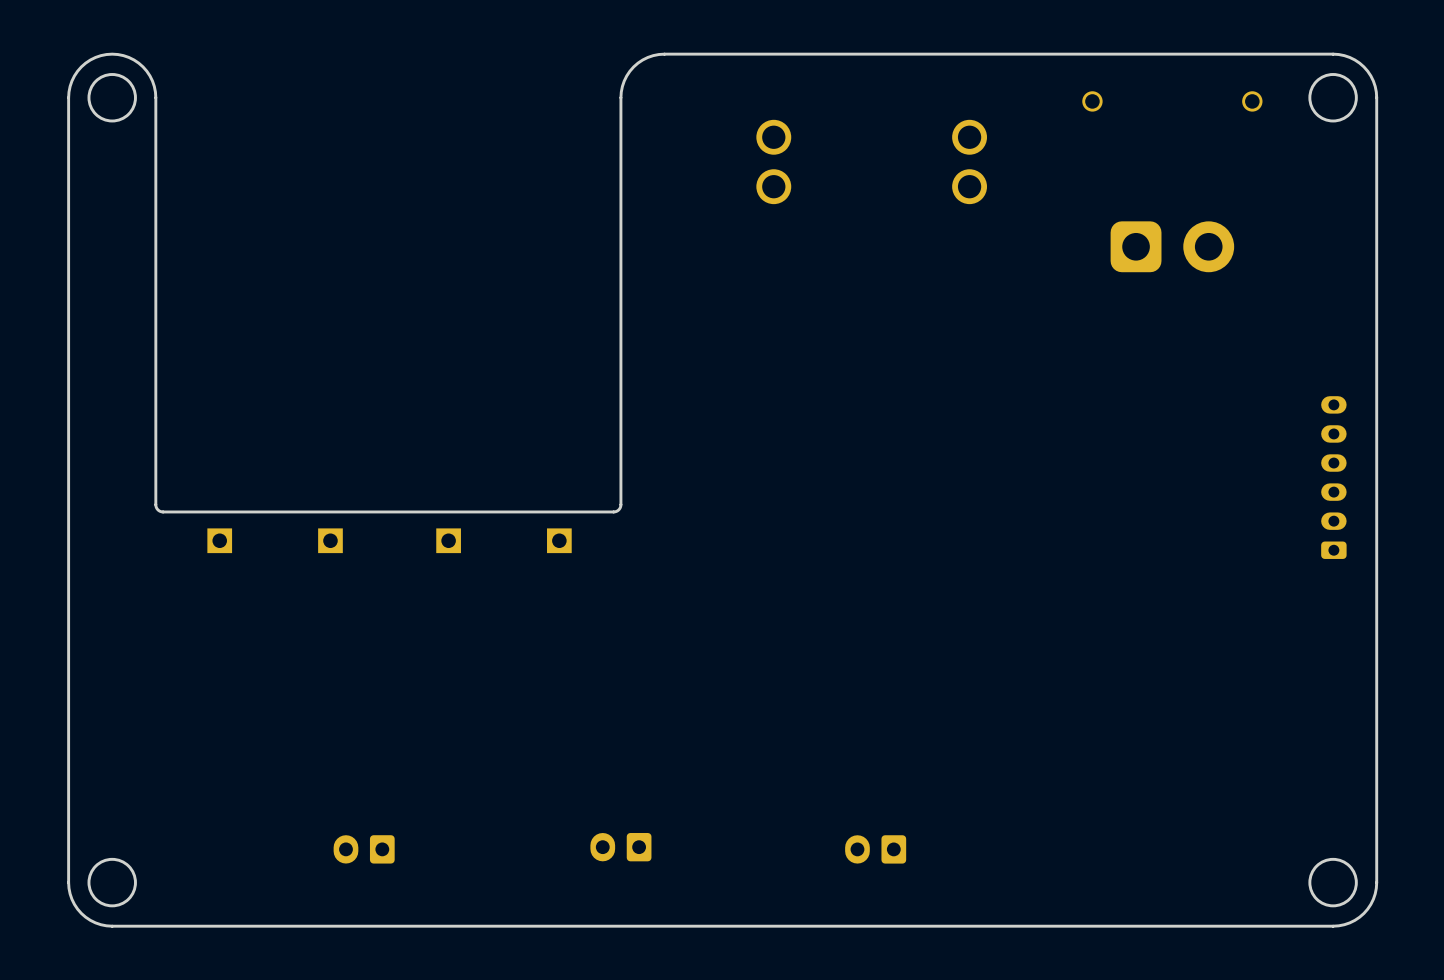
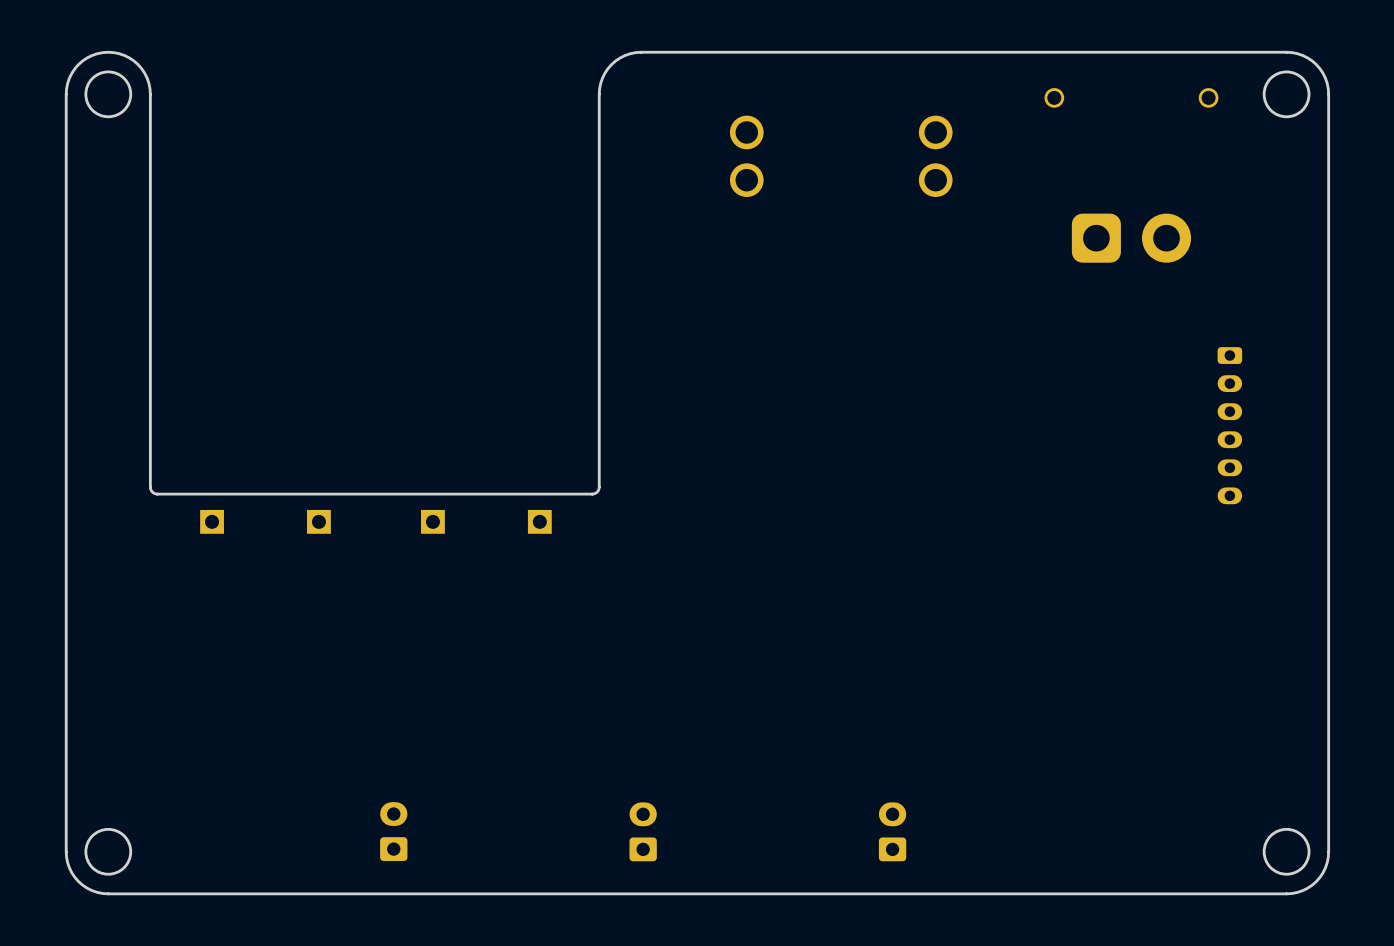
part rotation: 0° (1333, 477) -> 180° (1229, 425)
part rotation: 0° (620, 847) -> 90° clockwise (643, 831)
part position: (620, 847) -> (643, 831)
part rotation: 0° (364, 849) -> 90° clockwise (393, 831)
part position: (364, 849) -> (393, 831)
part rotation: 0° (875, 849) -> 90° clockwise (892, 831)
part position: (875, 849) -> (892, 831)

